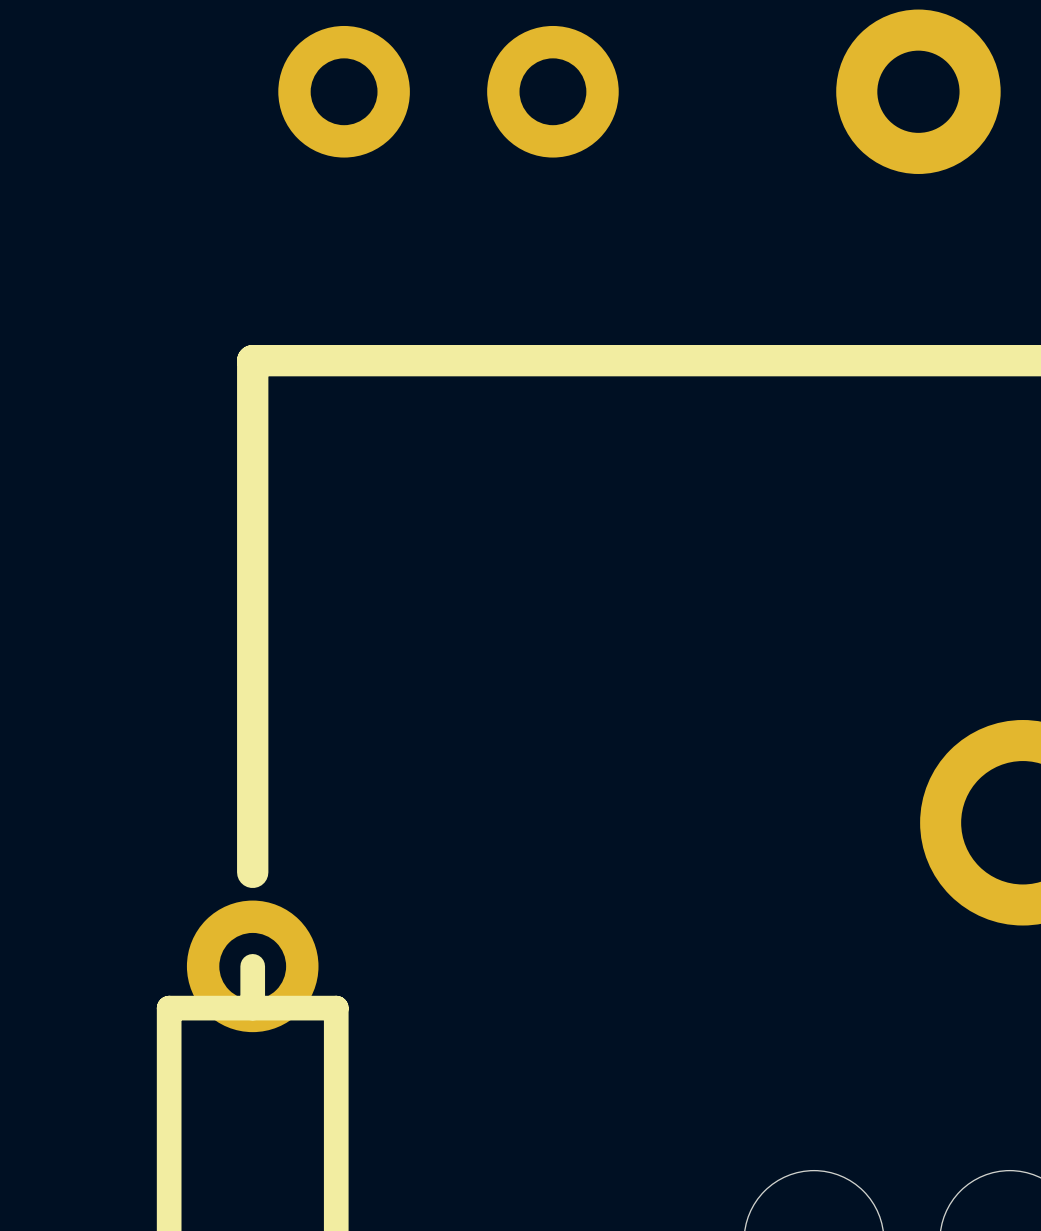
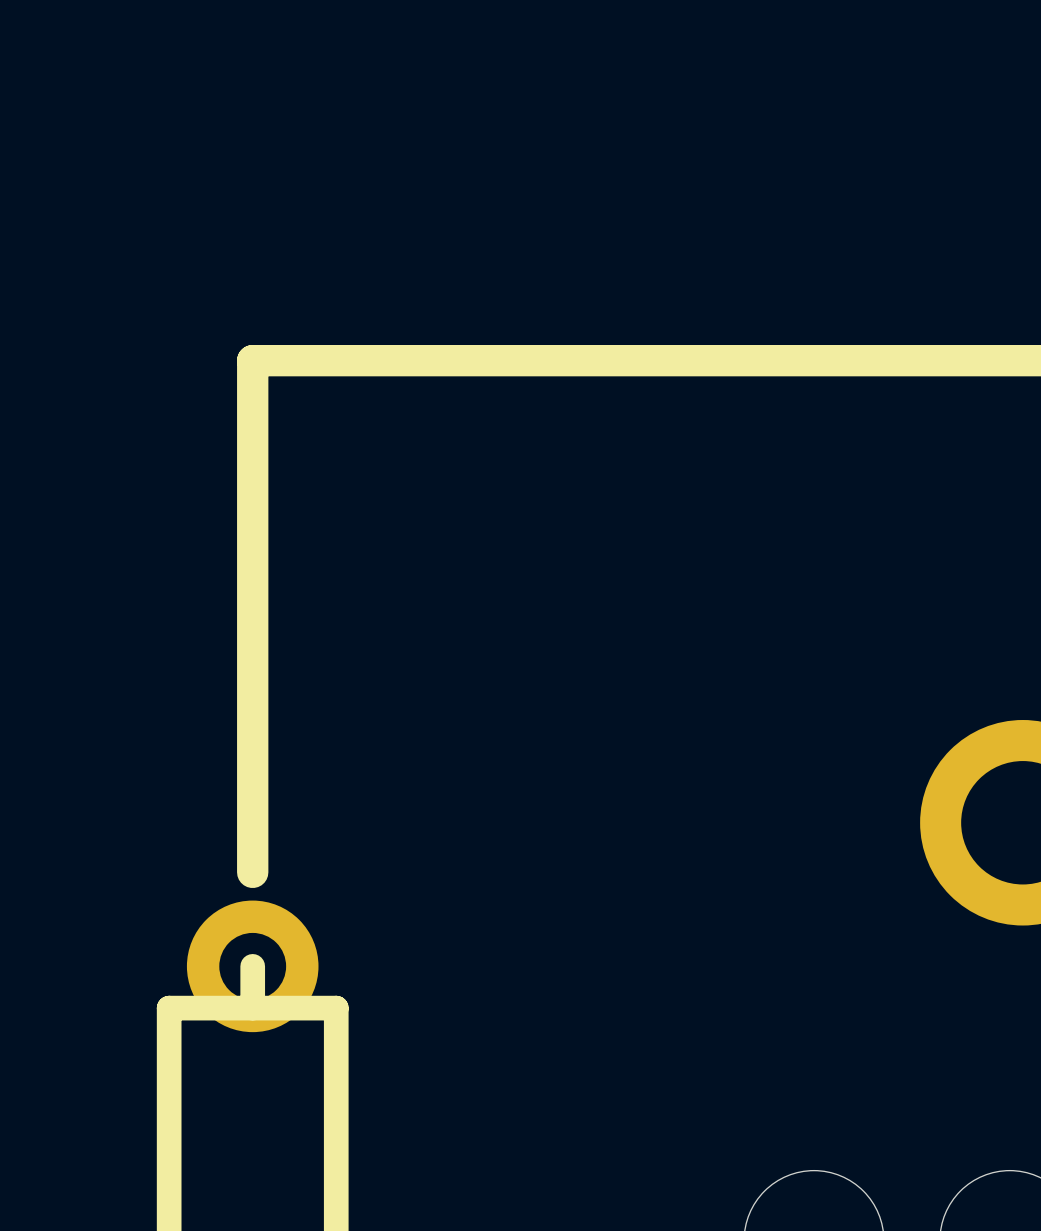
part: (448, 91) -> none
part: (918, 91) -> none

